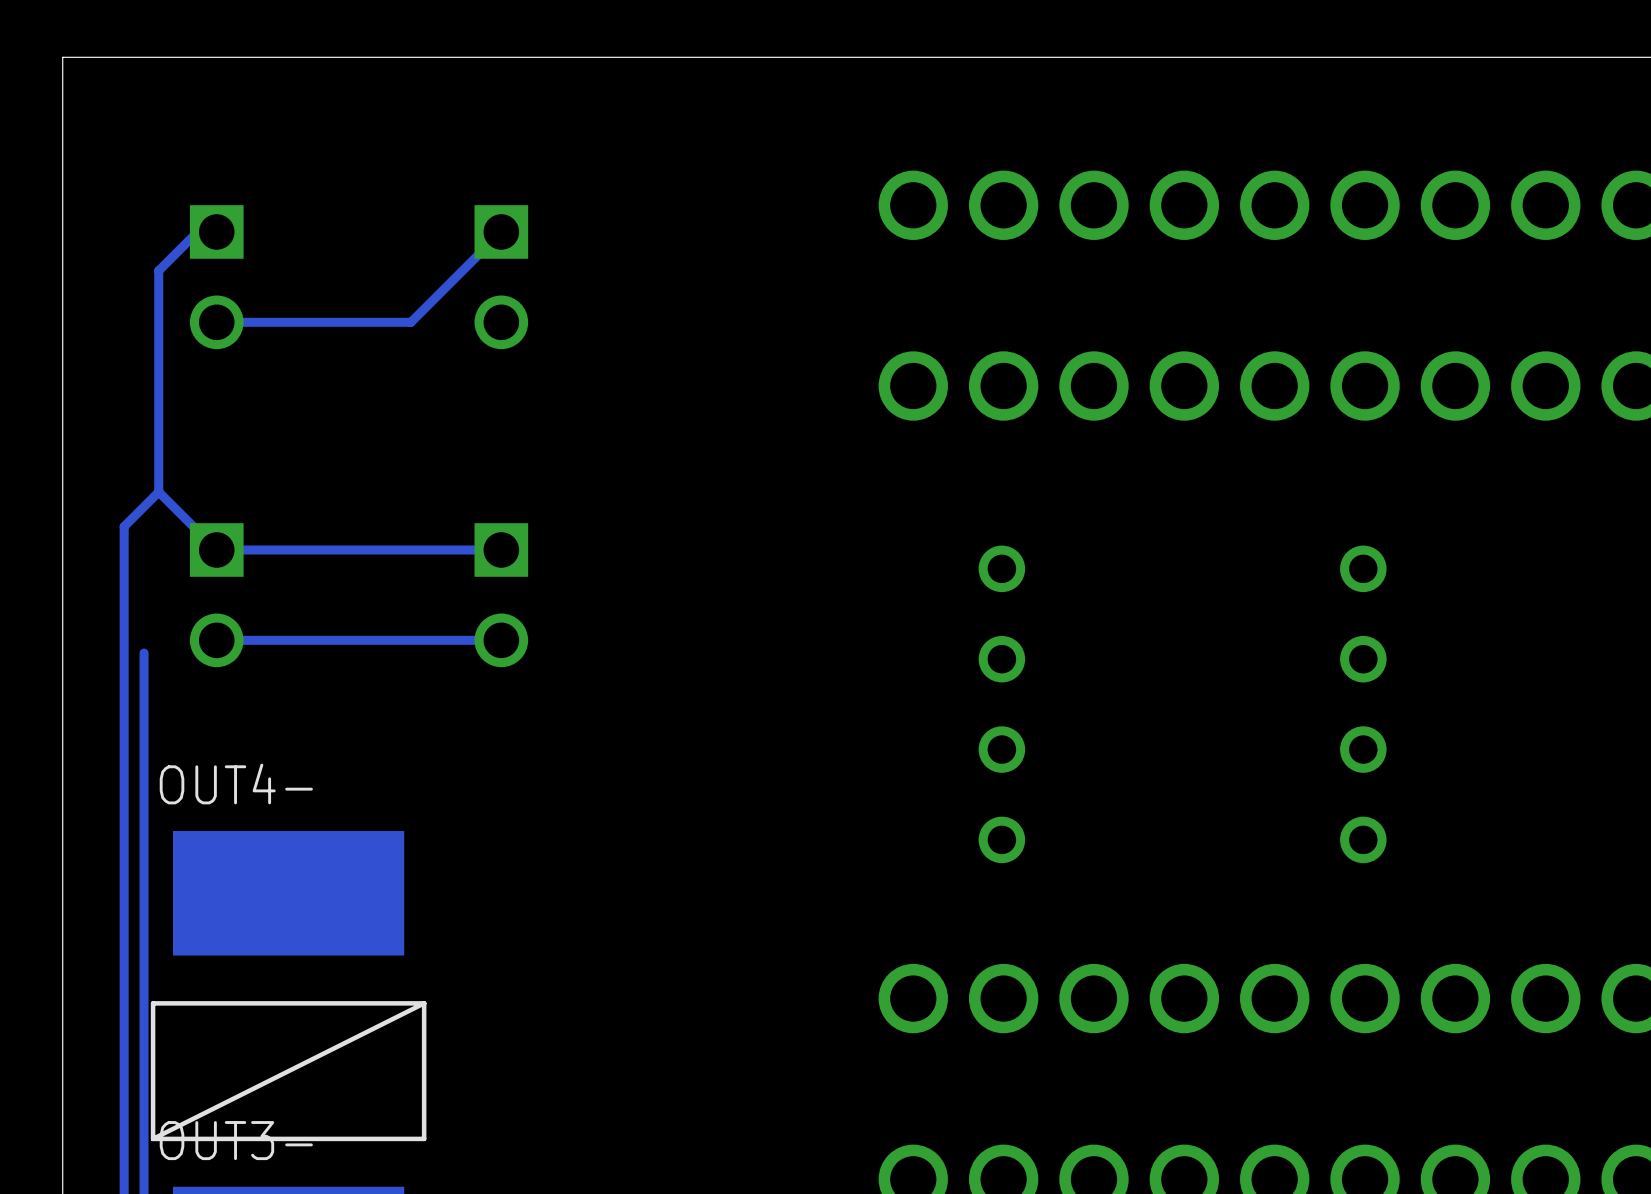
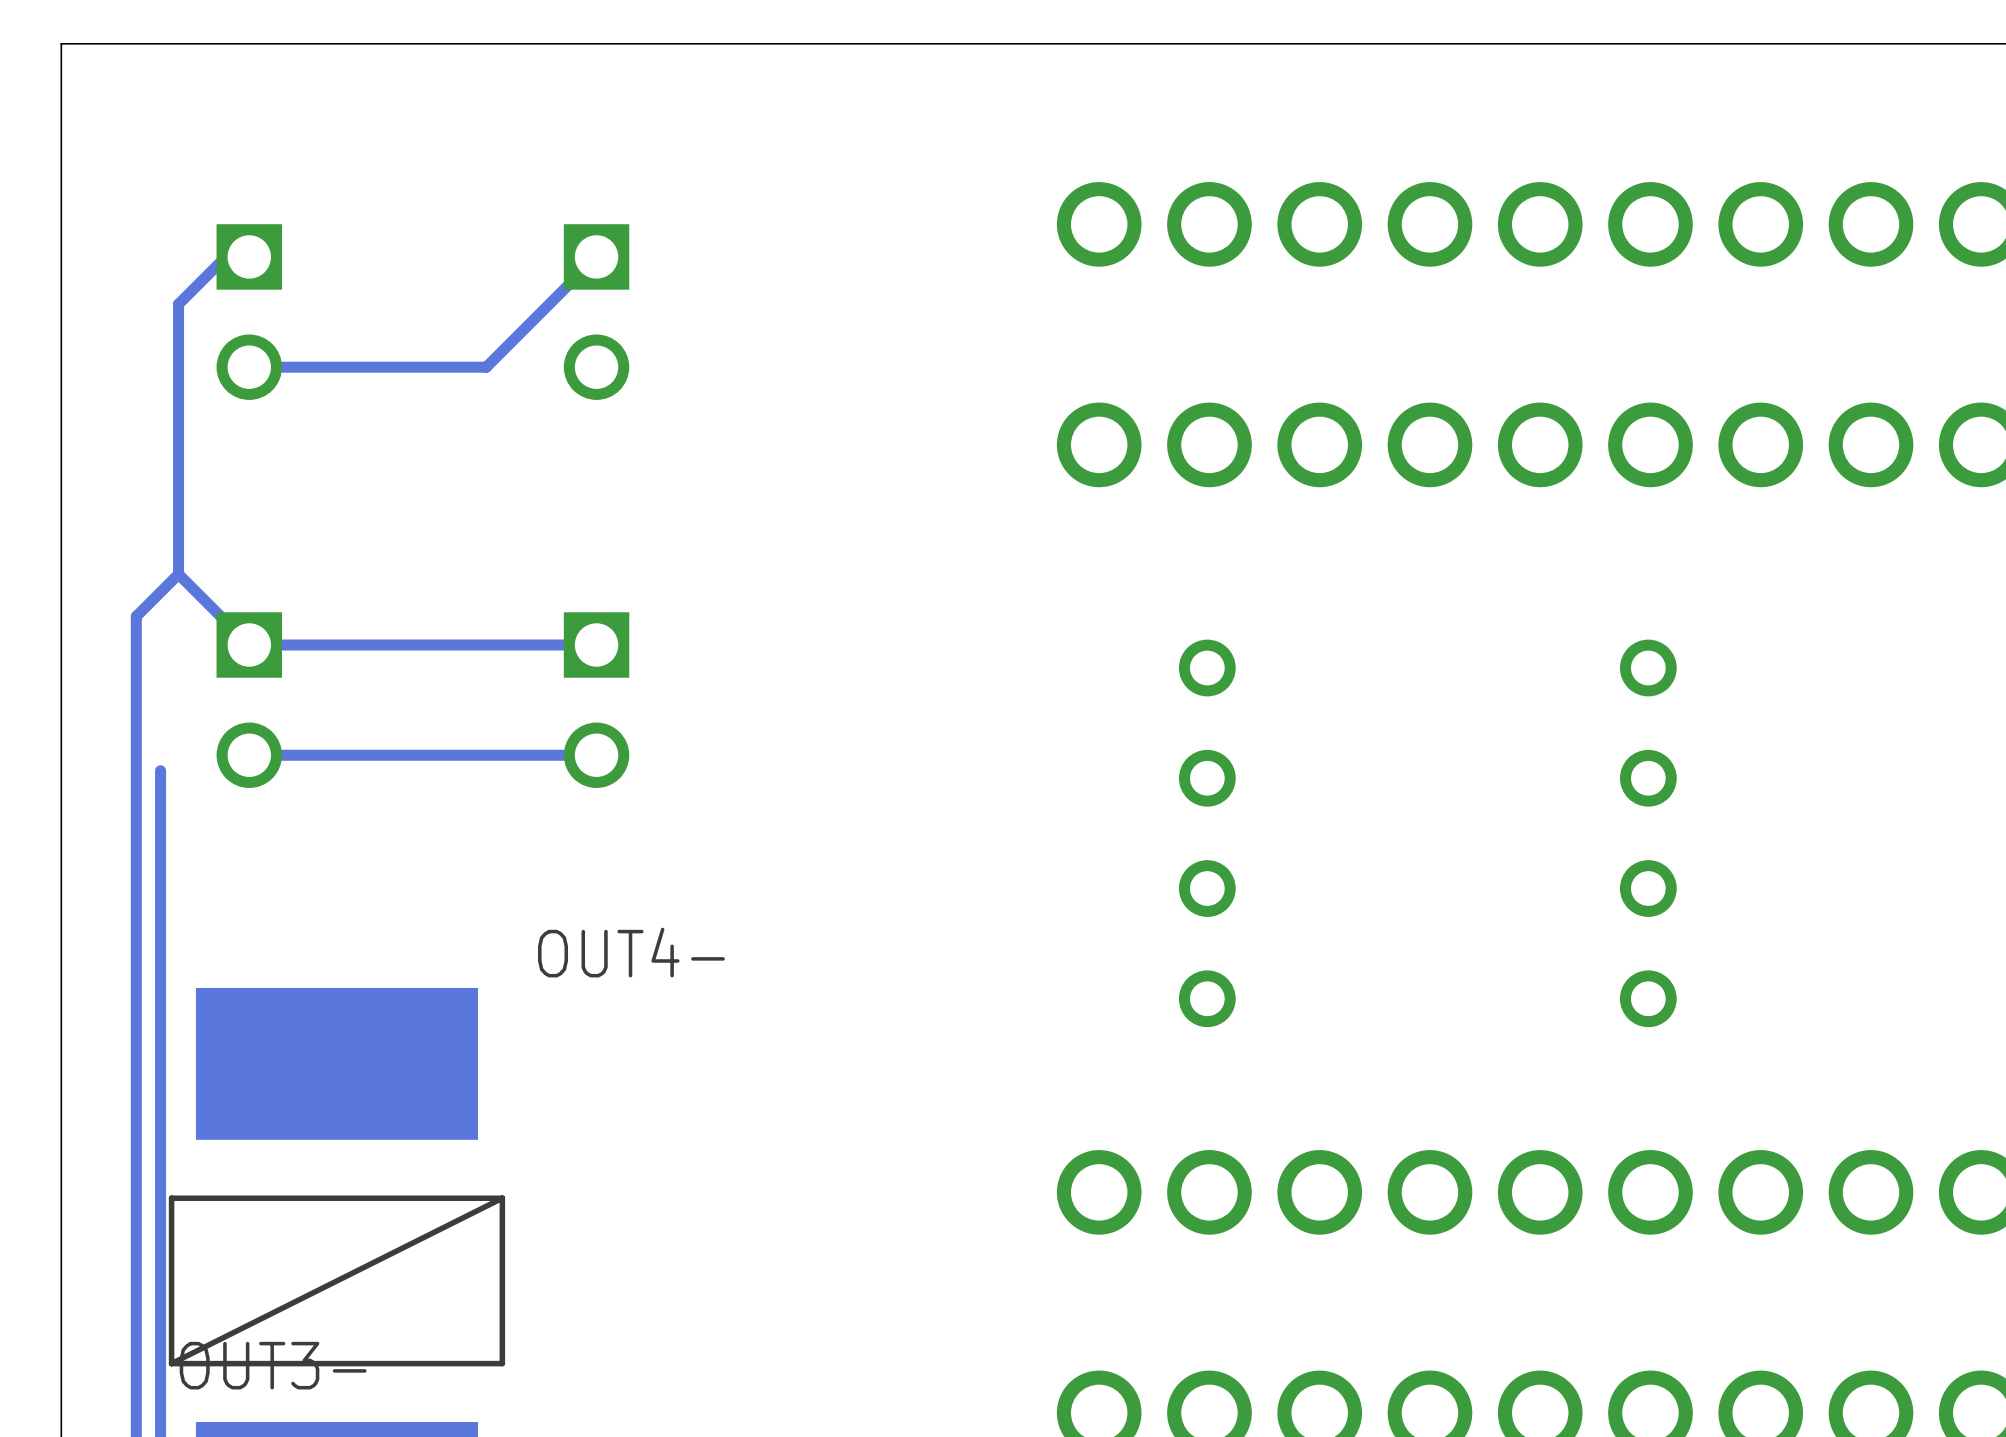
OUT4- name position: OUT4- (236, 783) -> OUT4- (631, 952)

